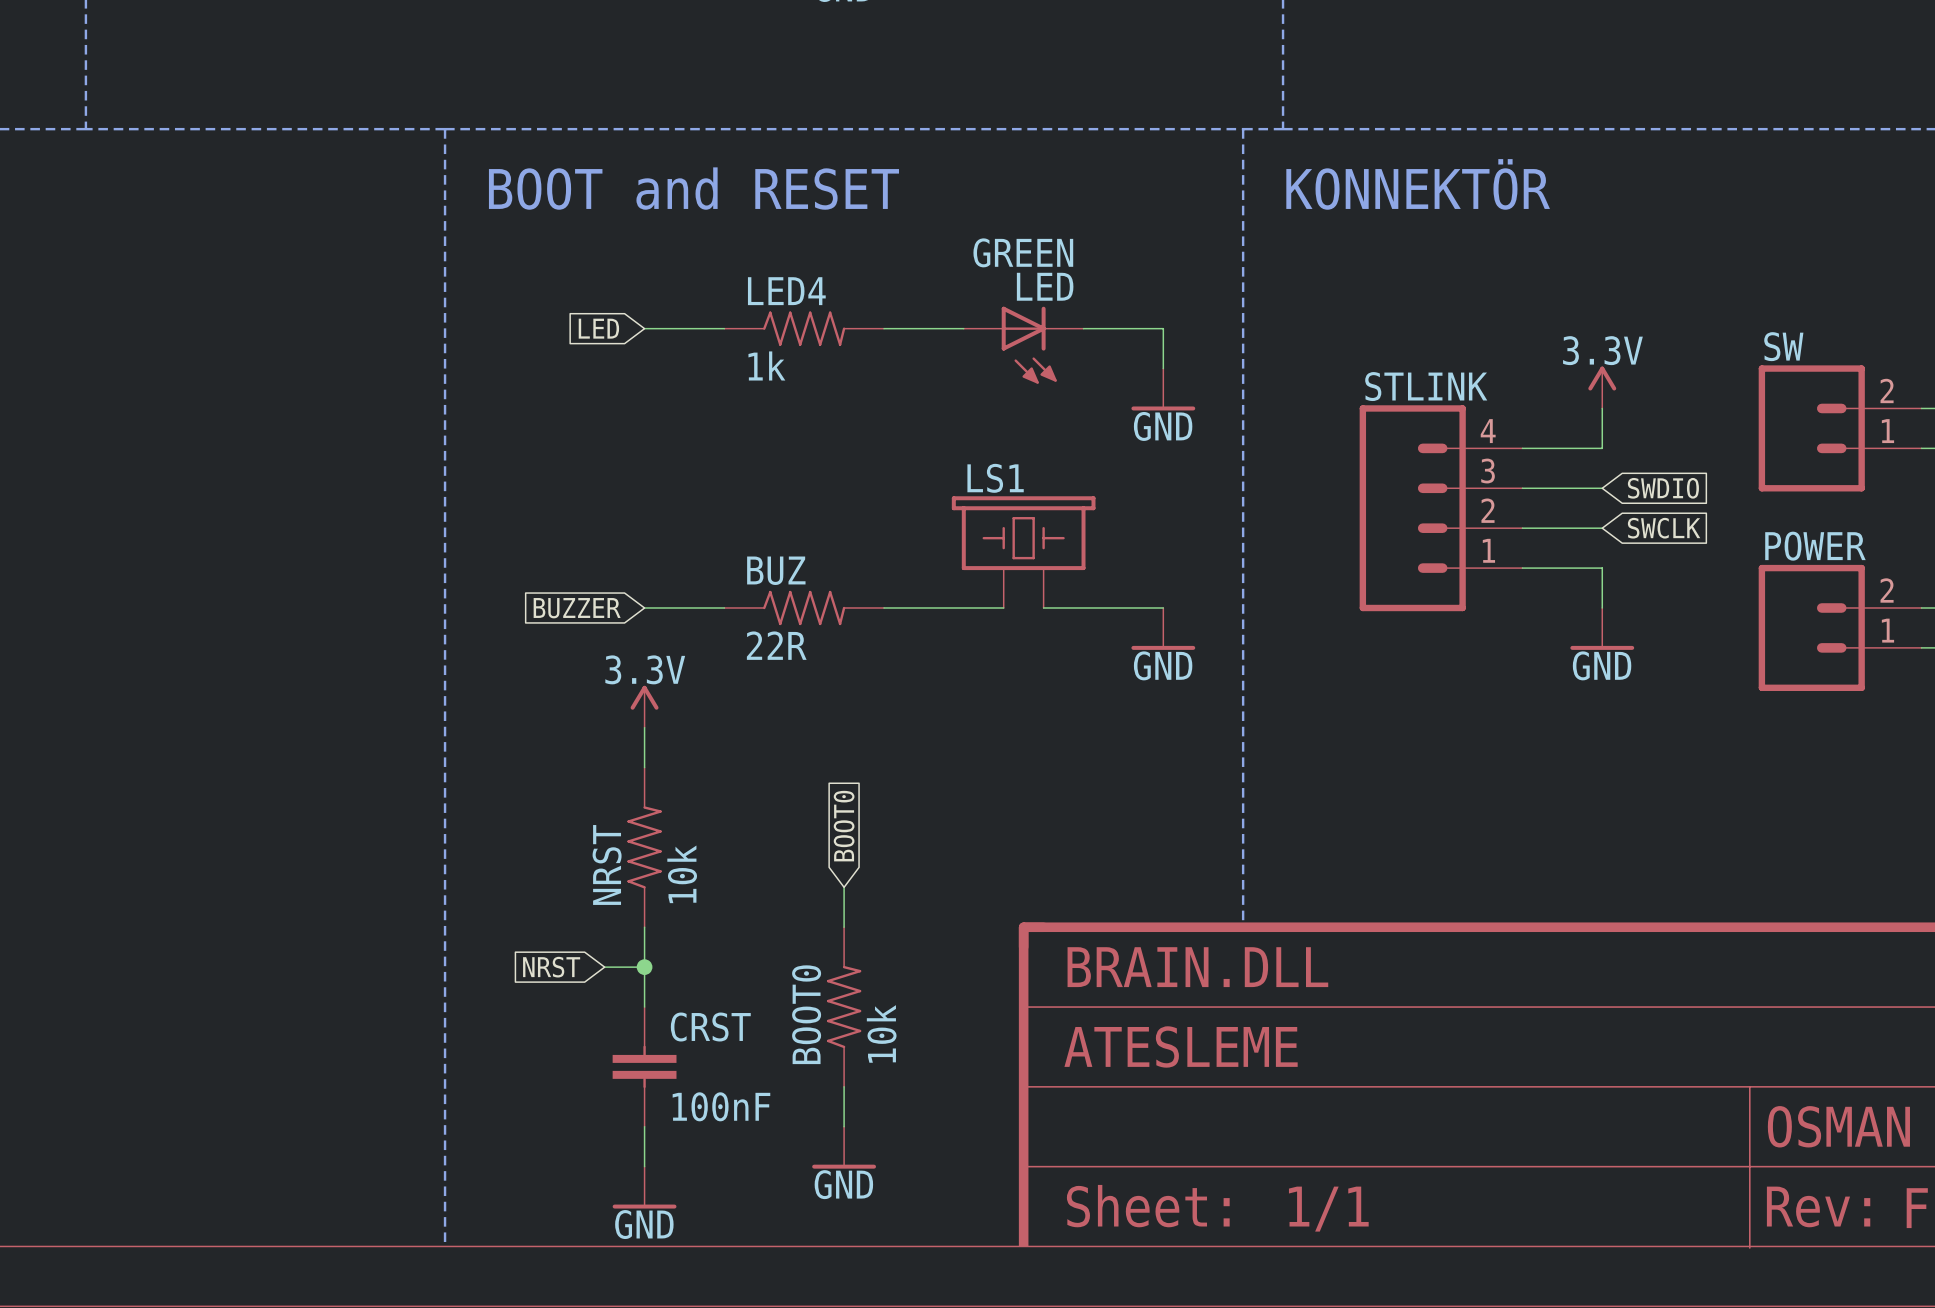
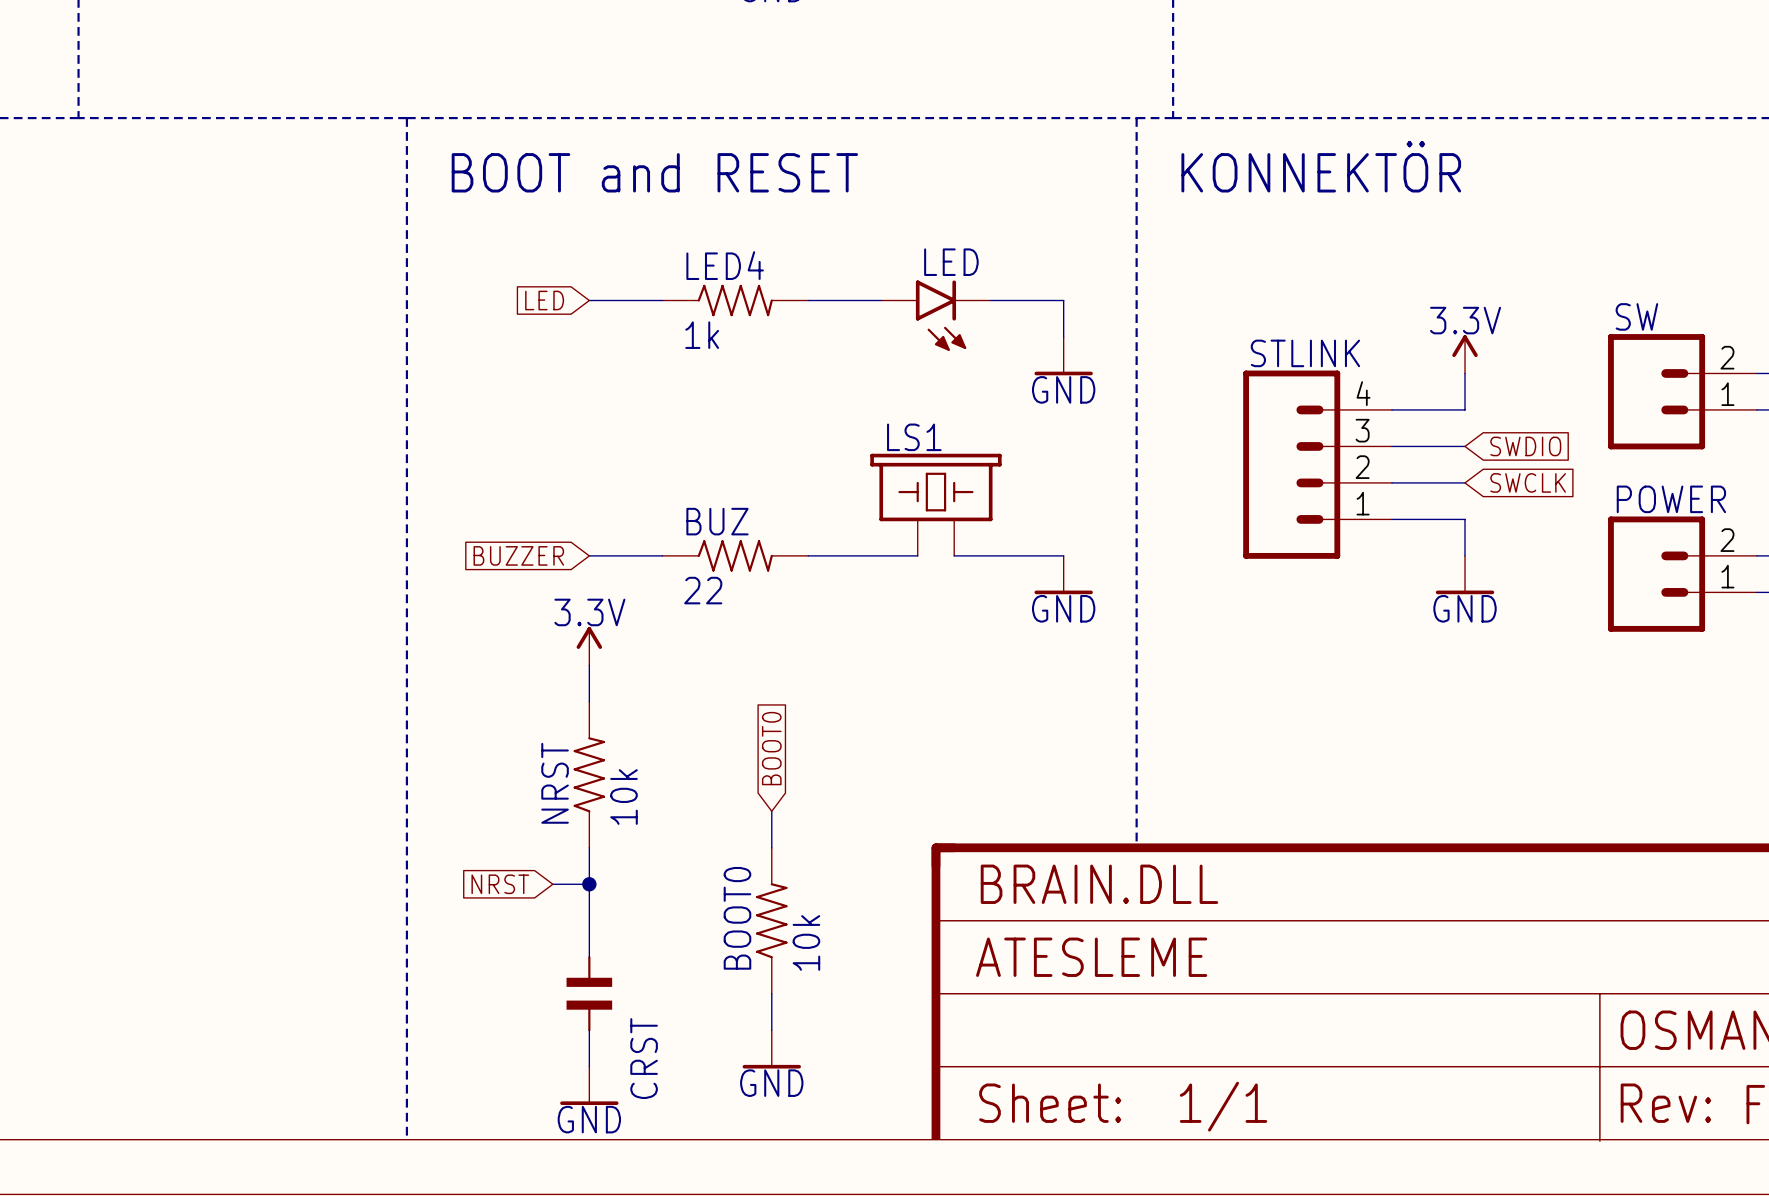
LED value: GREEN (1023, 252) -> none
LED symbol: [963, 306, 1084, 384] -> [881, 280, 991, 351]
BUZ value: 22R (776, 645) -> 22 (703, 590)
CRST: 100nF (644, 1066) -> none
CRST: none -> (589, 993)

